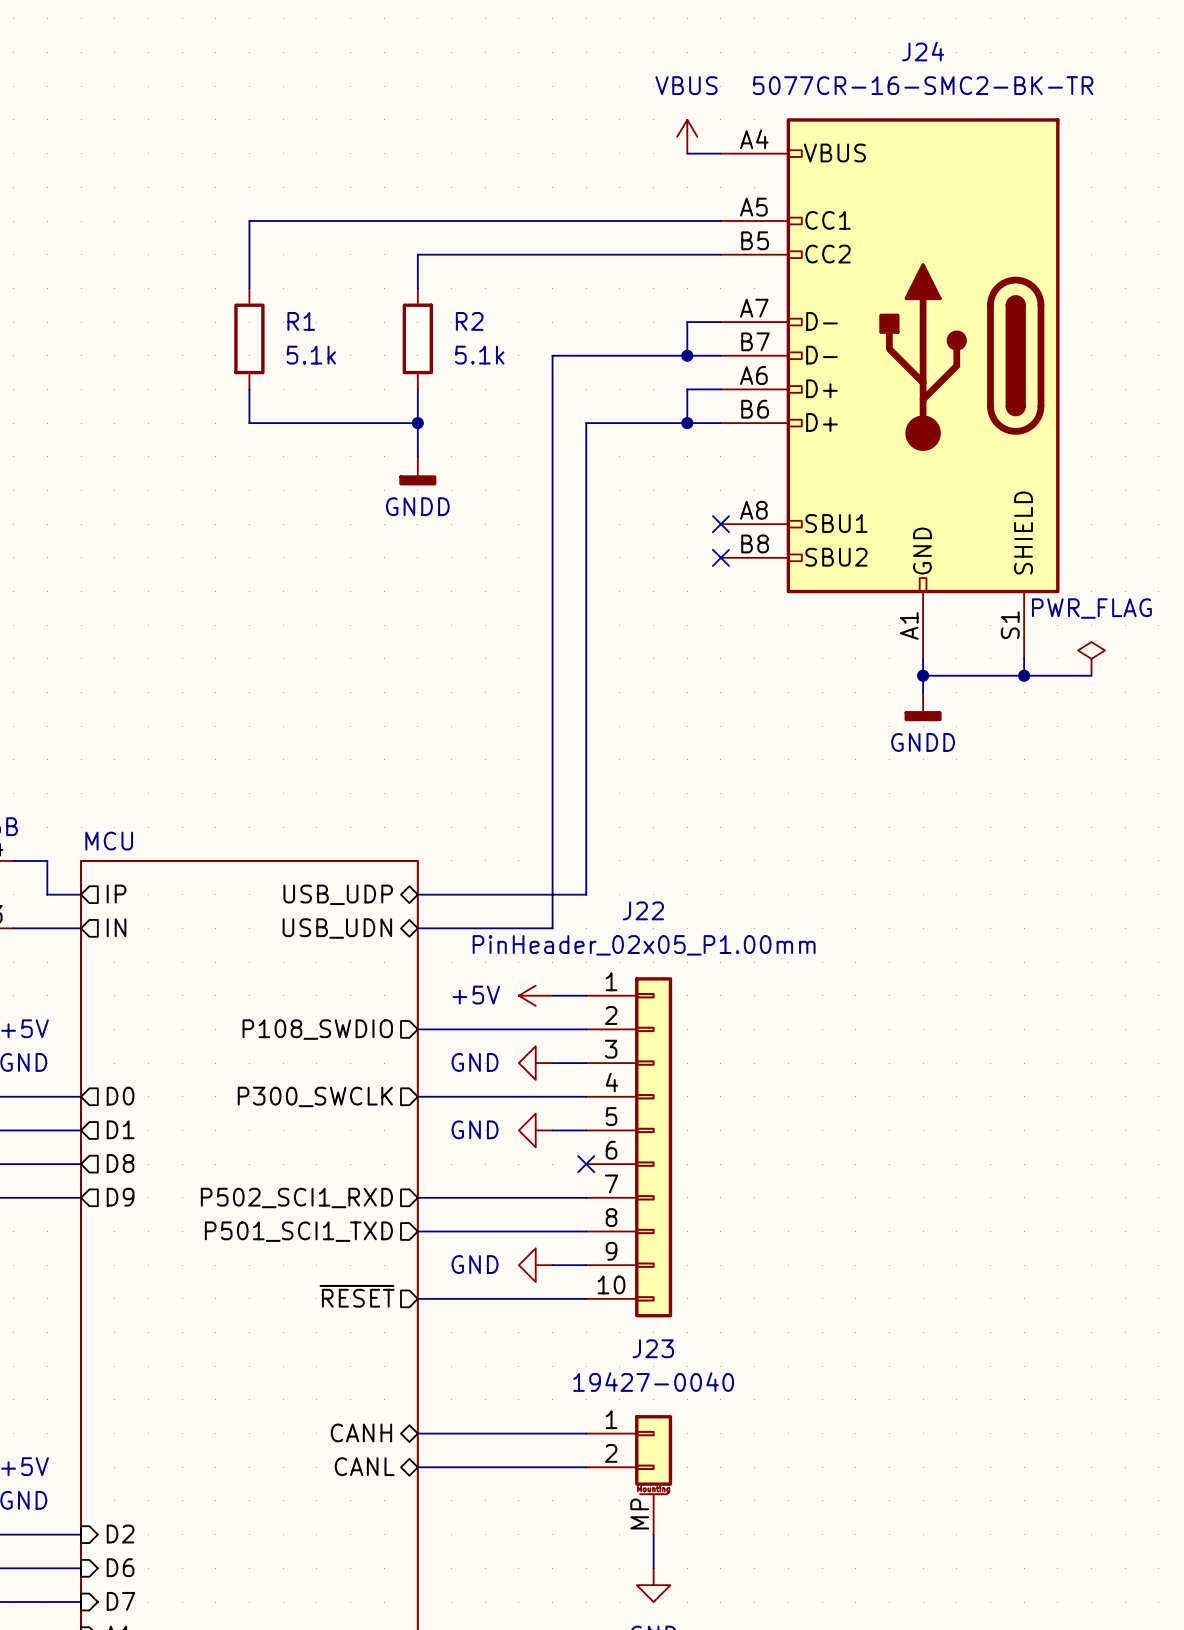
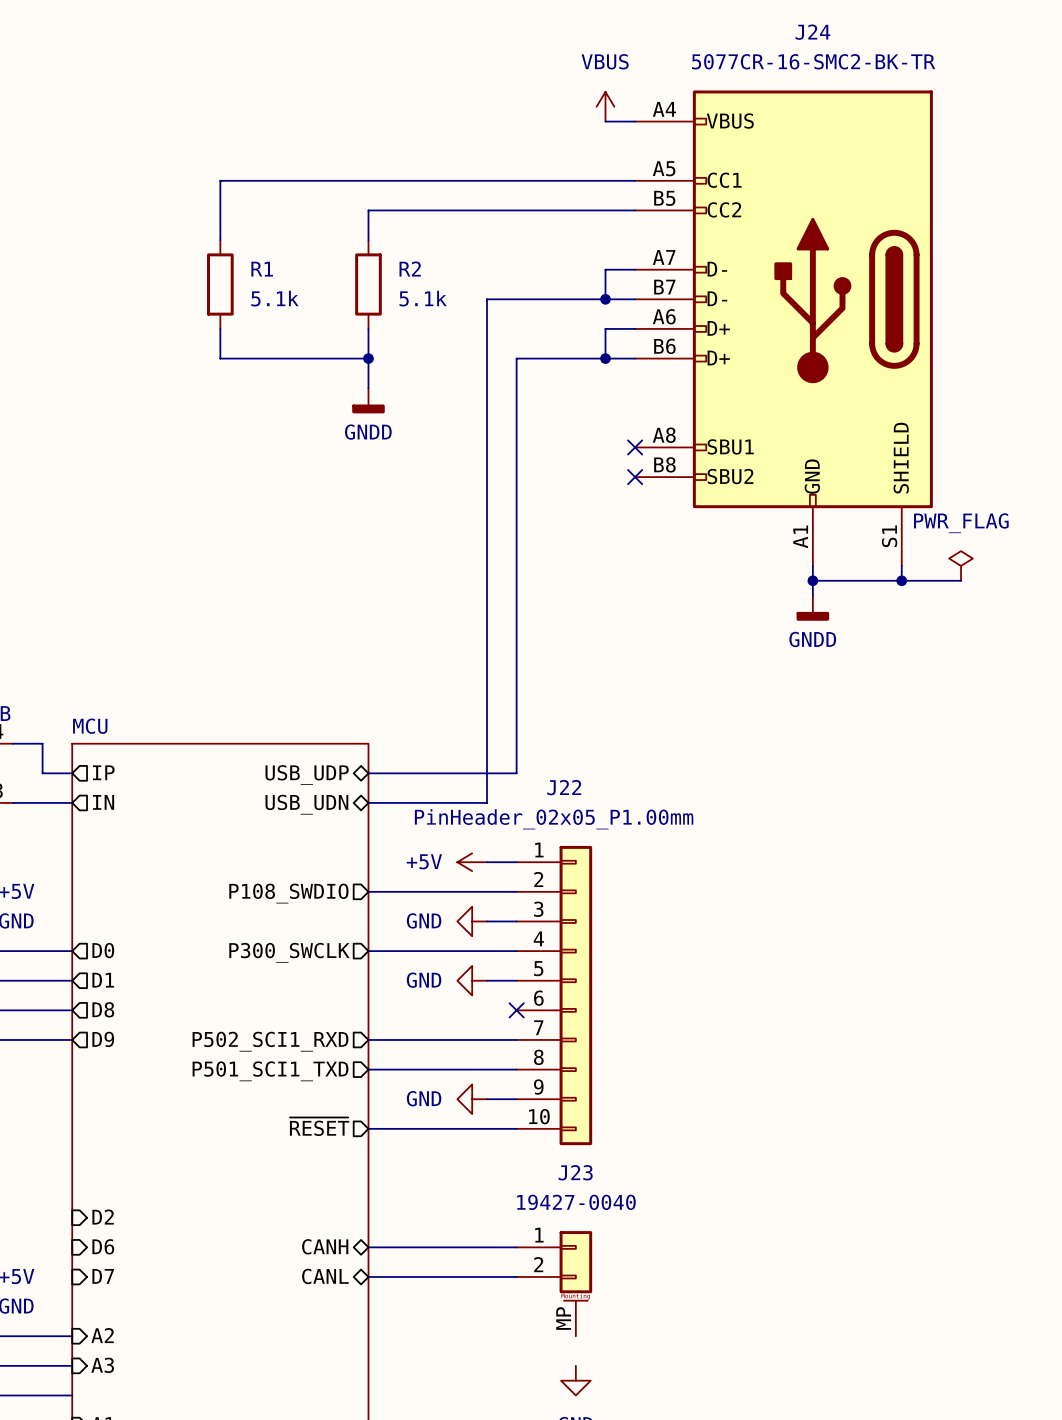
sheet pin: none -> D2 (103, 1217)
sheet pin: none -> D6 (103, 1246)
sheet pin: D2 (120, 1534) -> A2 (102, 1335)
wire: (653, 1534) (653, 1568) -> none
sheet pin: D6 (120, 1567) -> A3 (102, 1365)
sheet pin position: D7 (120, 1601) -> D7 (103, 1276)

